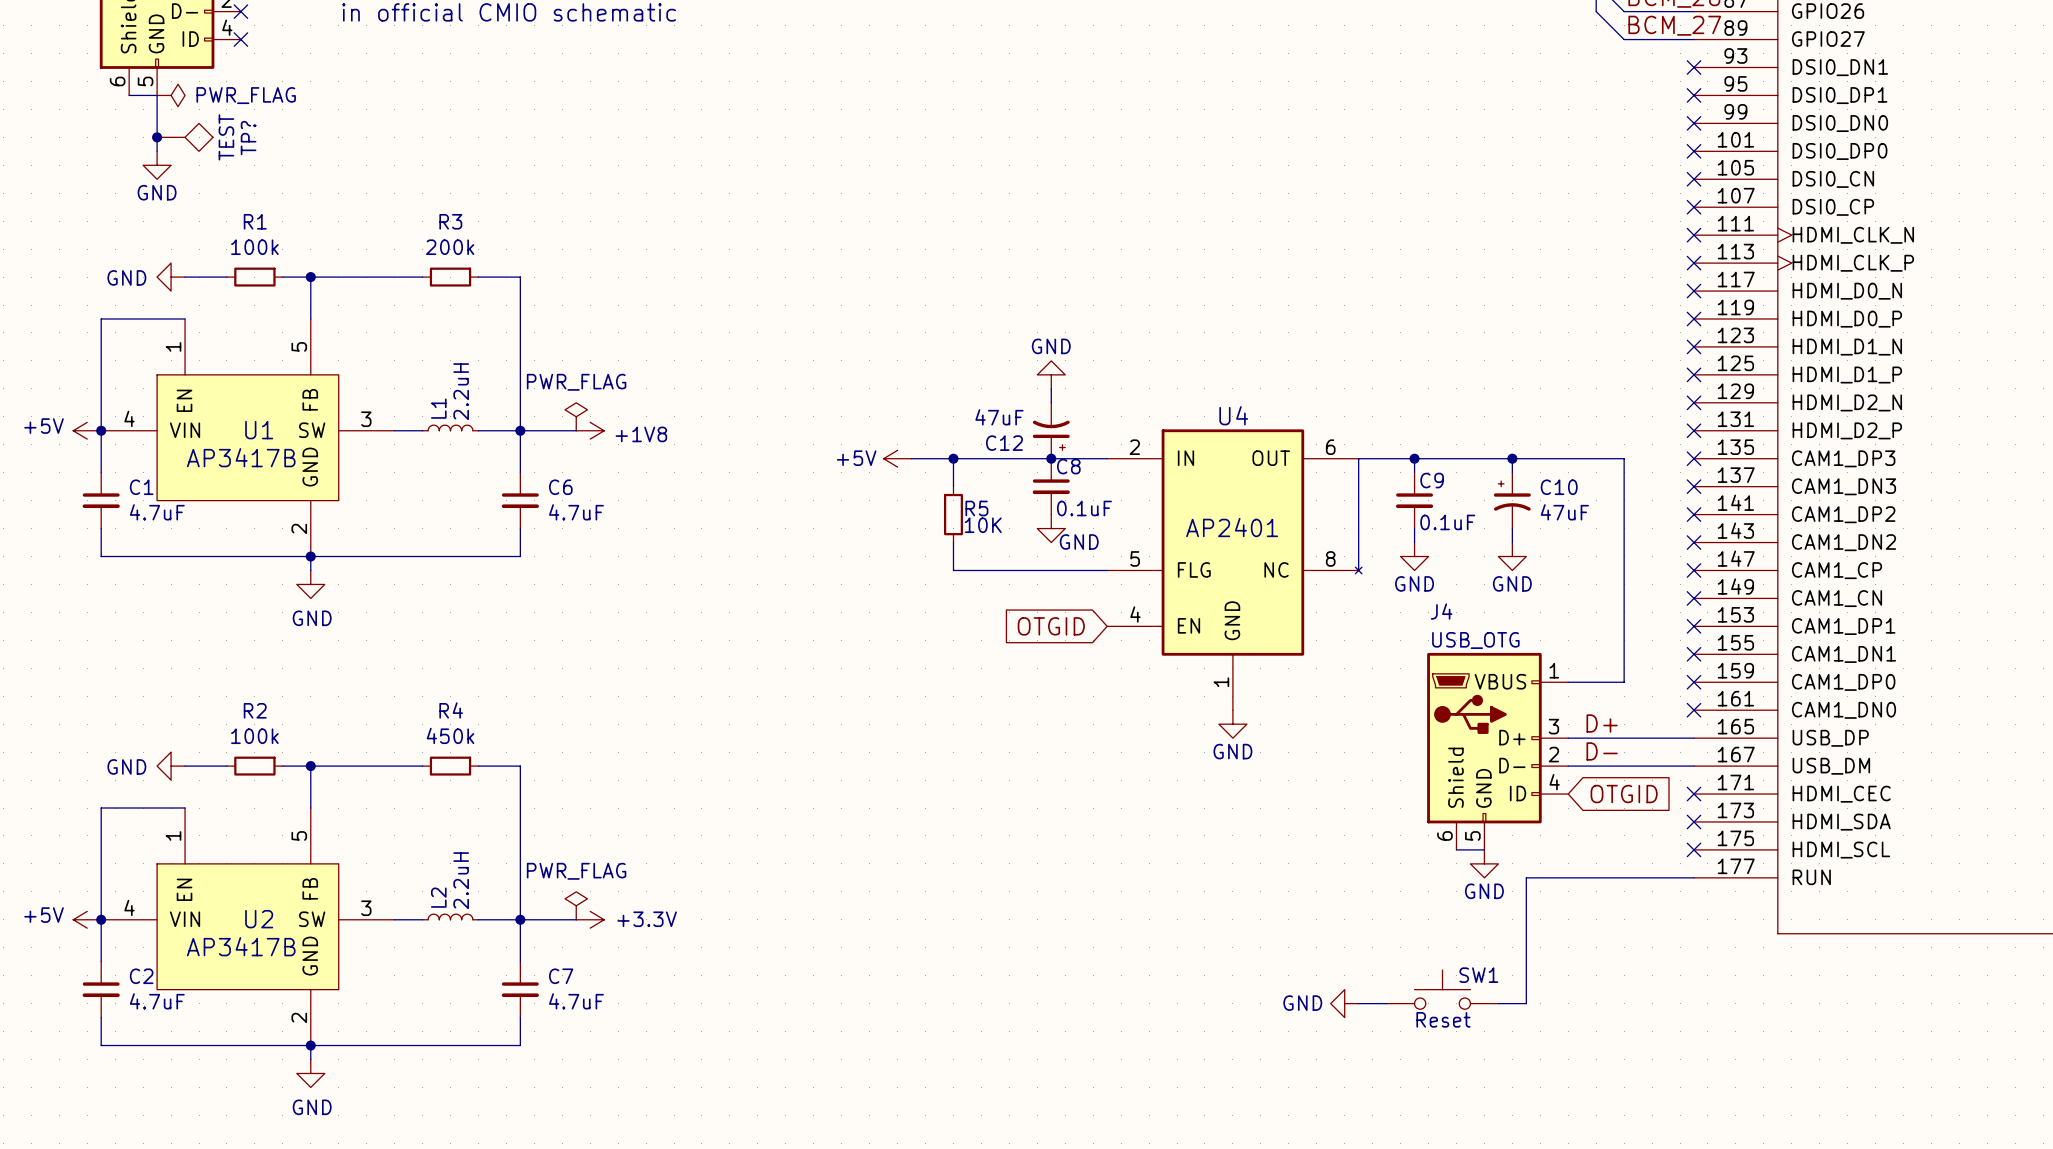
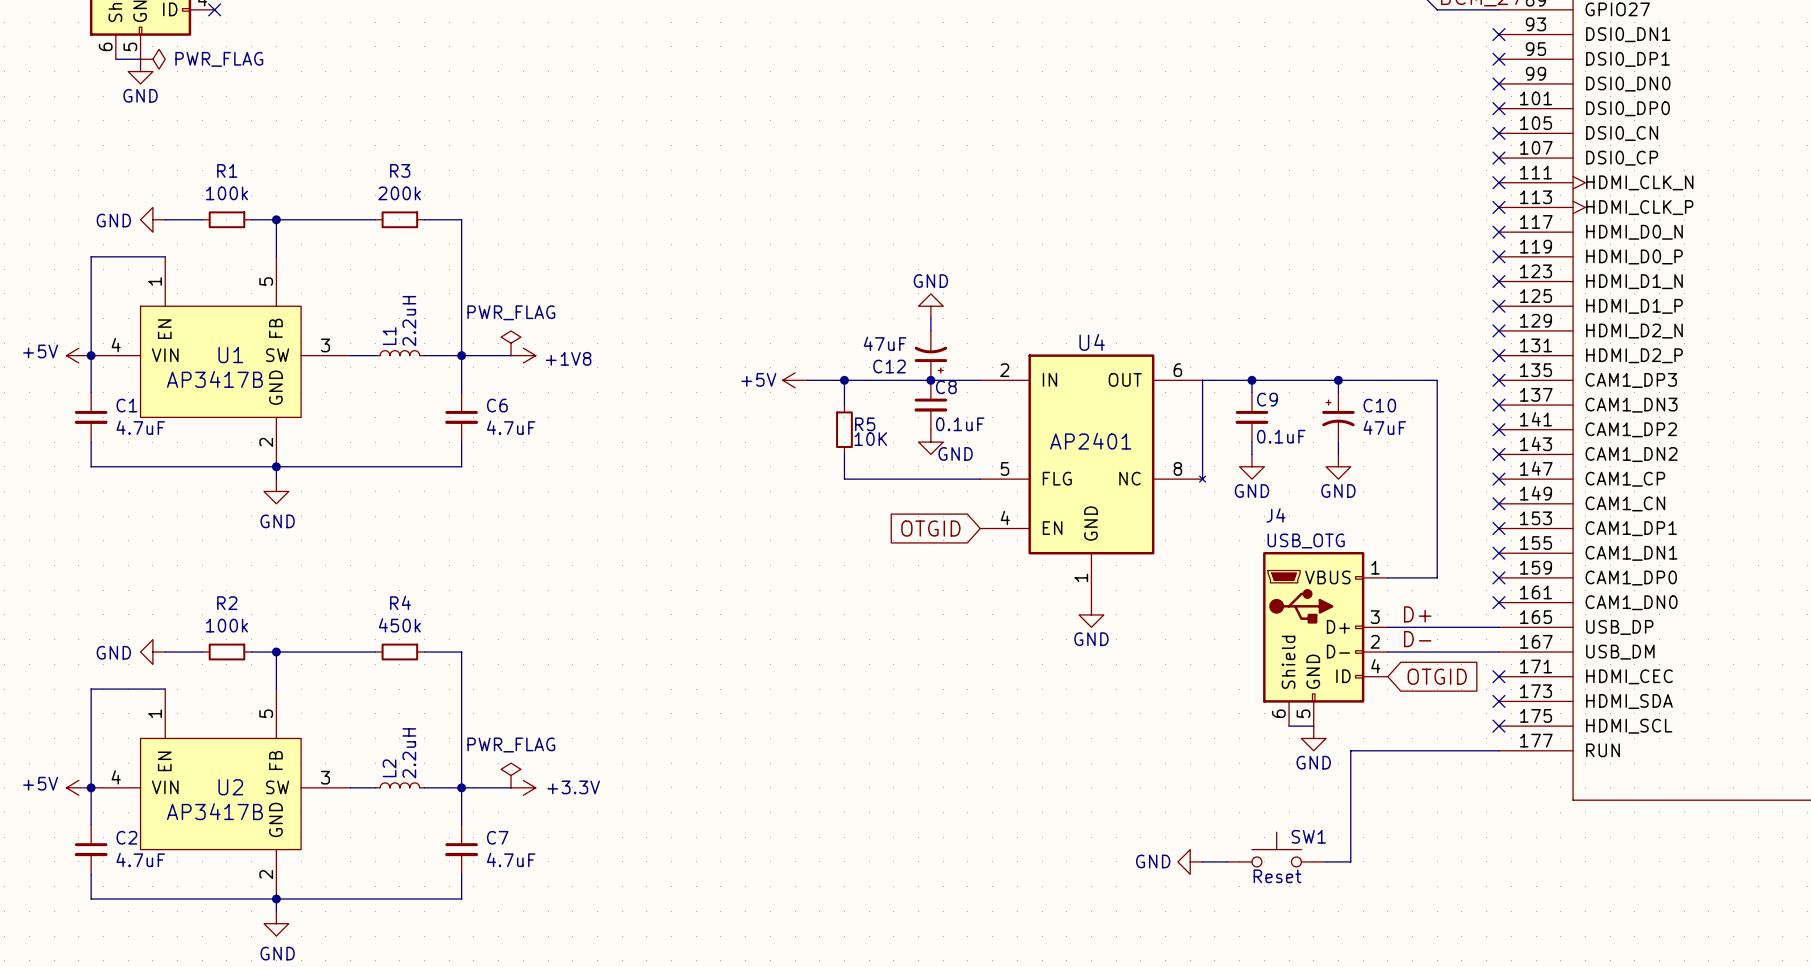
wire: (157, 95) (157, 151) -> none
junction: (157, 137) -> none
TP?: TEST (185, 137) -> none
power symbol position: GND (157, 165) -> GND (140, 71)

